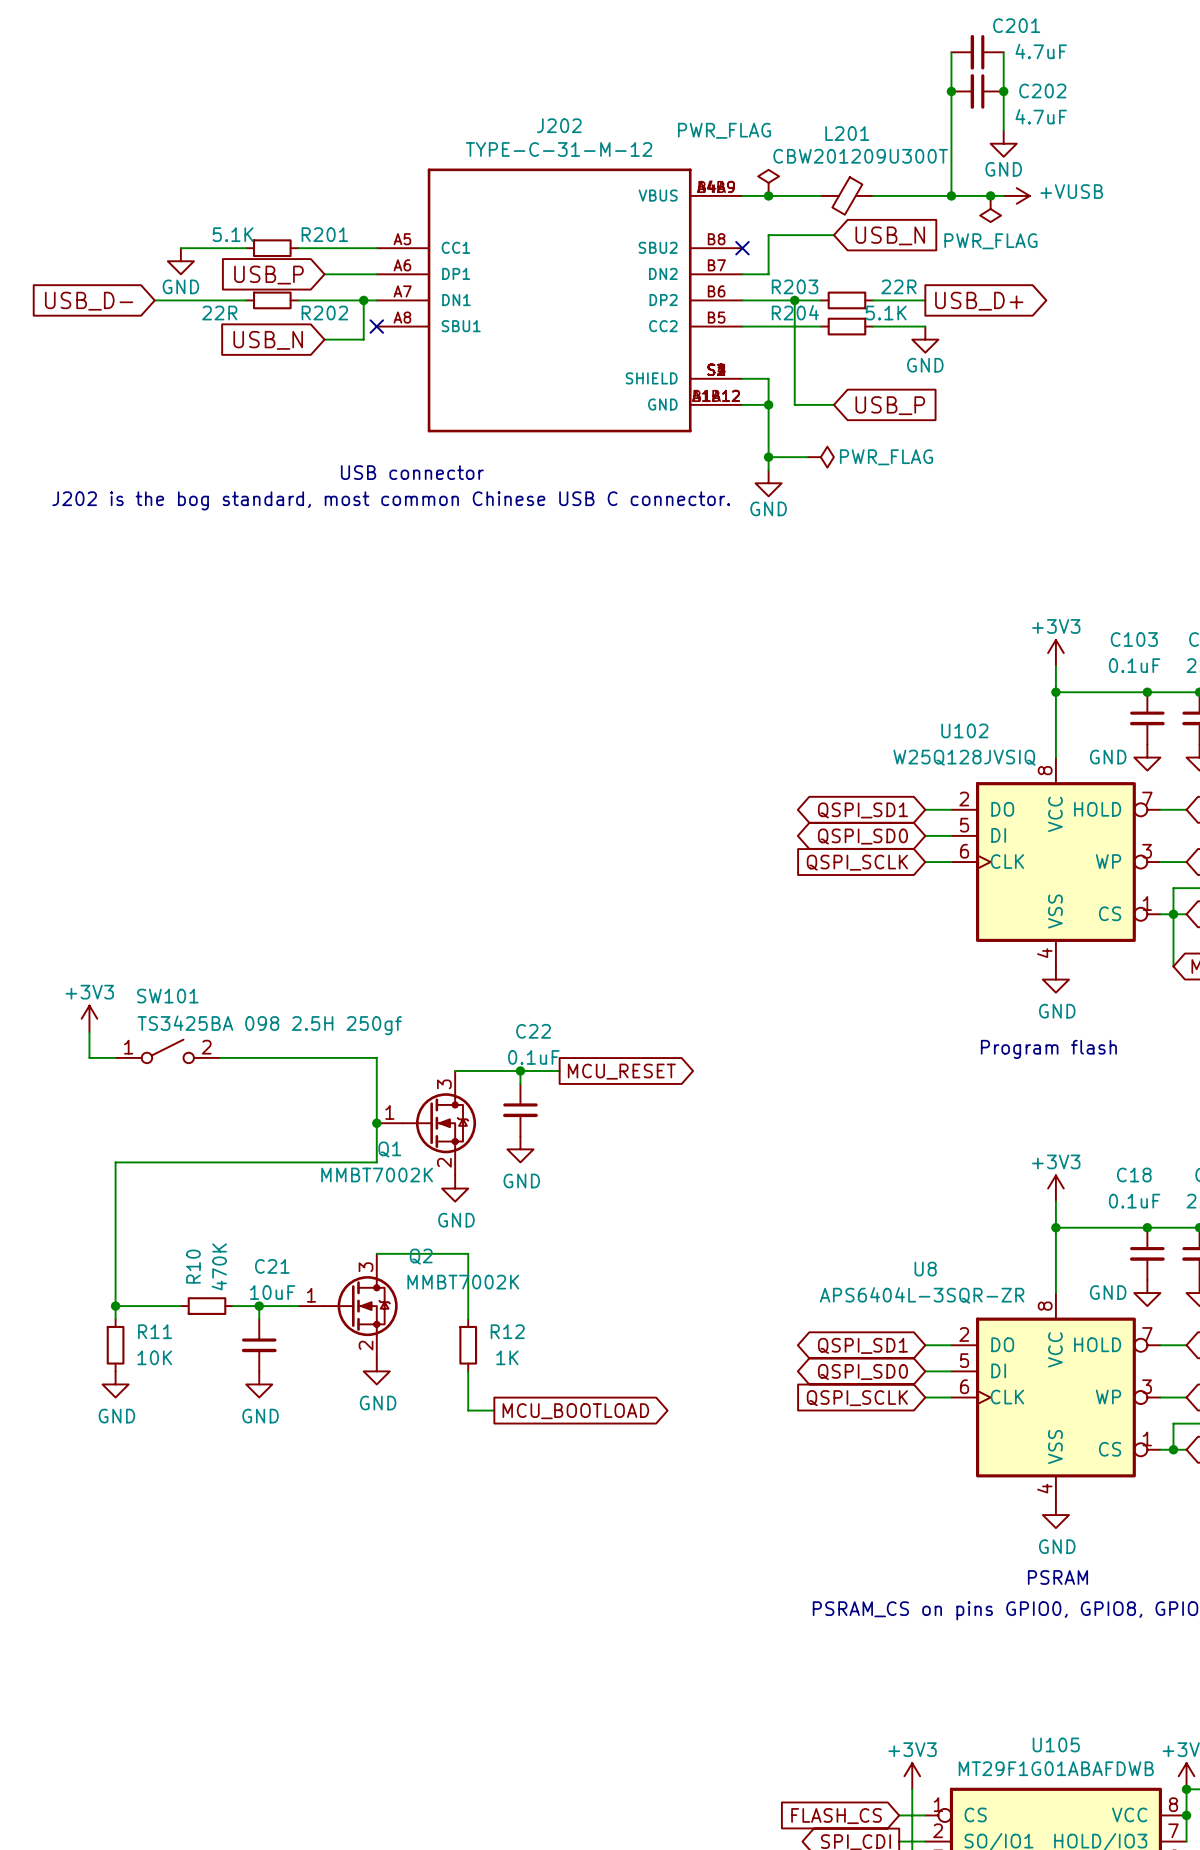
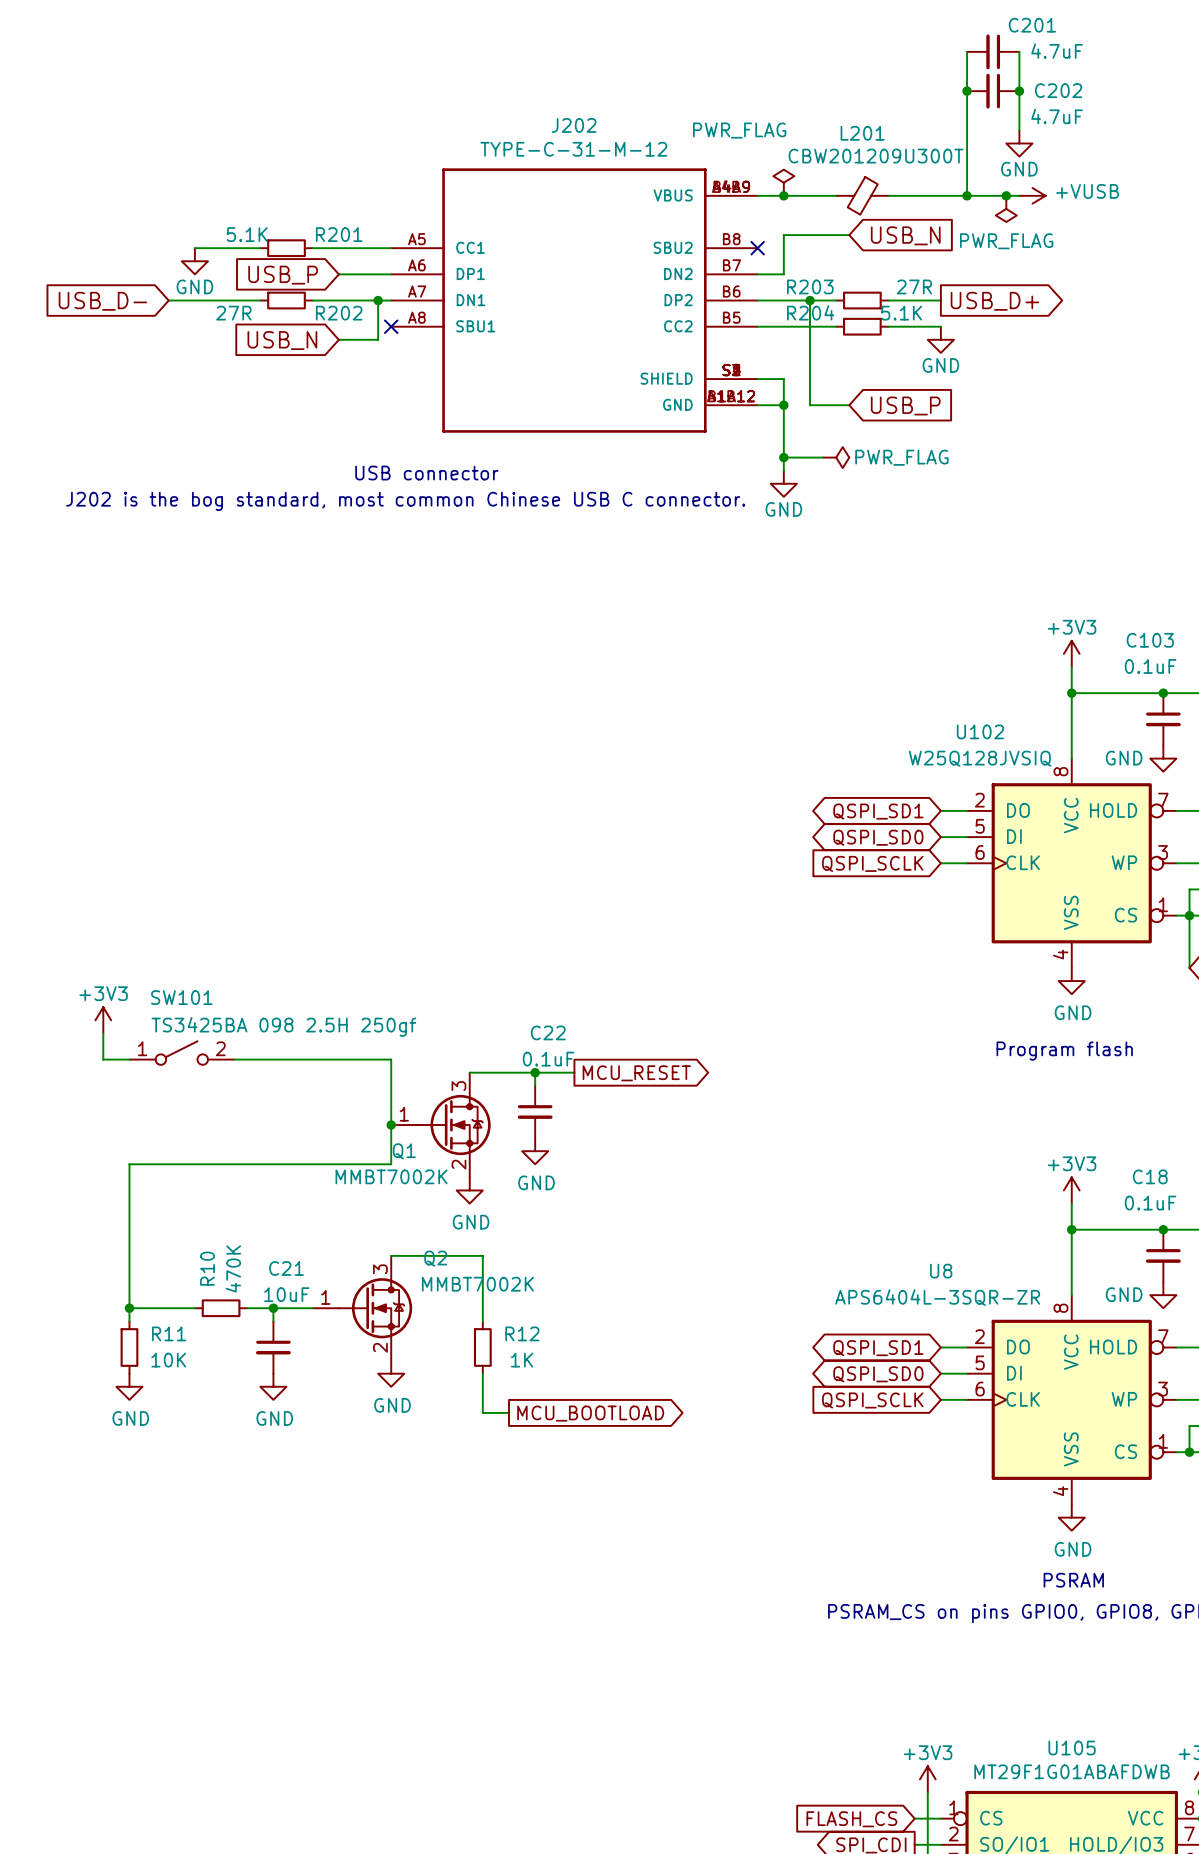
R203 value: 22R (898, 286) -> 27R (914, 286)
R202 value: 22R (219, 313) -> 27R (233, 313)

